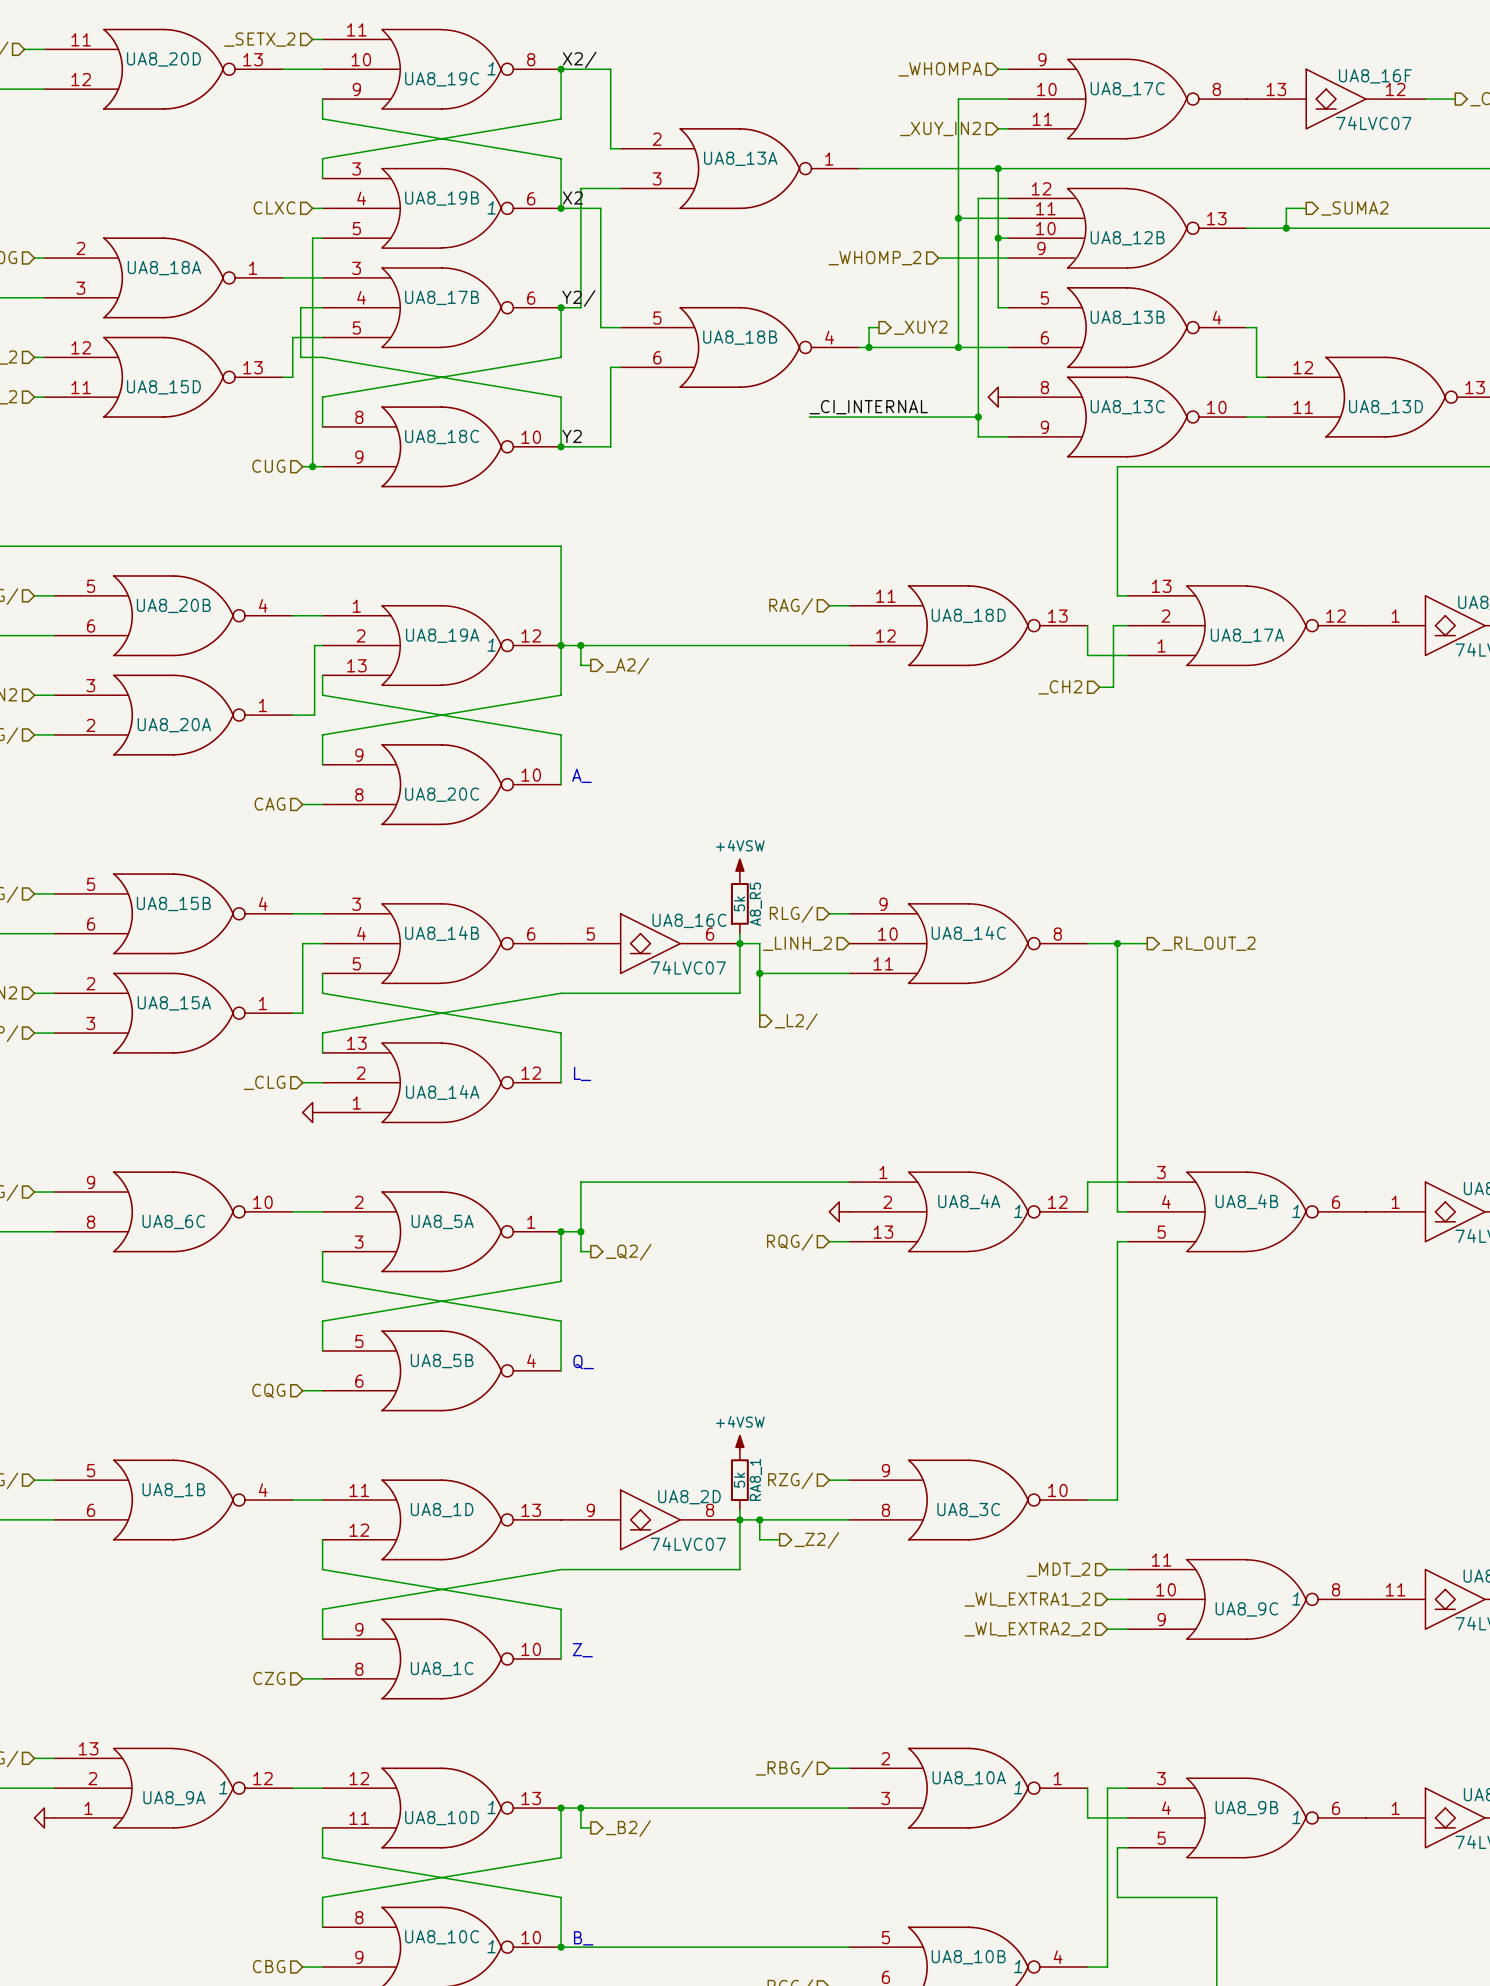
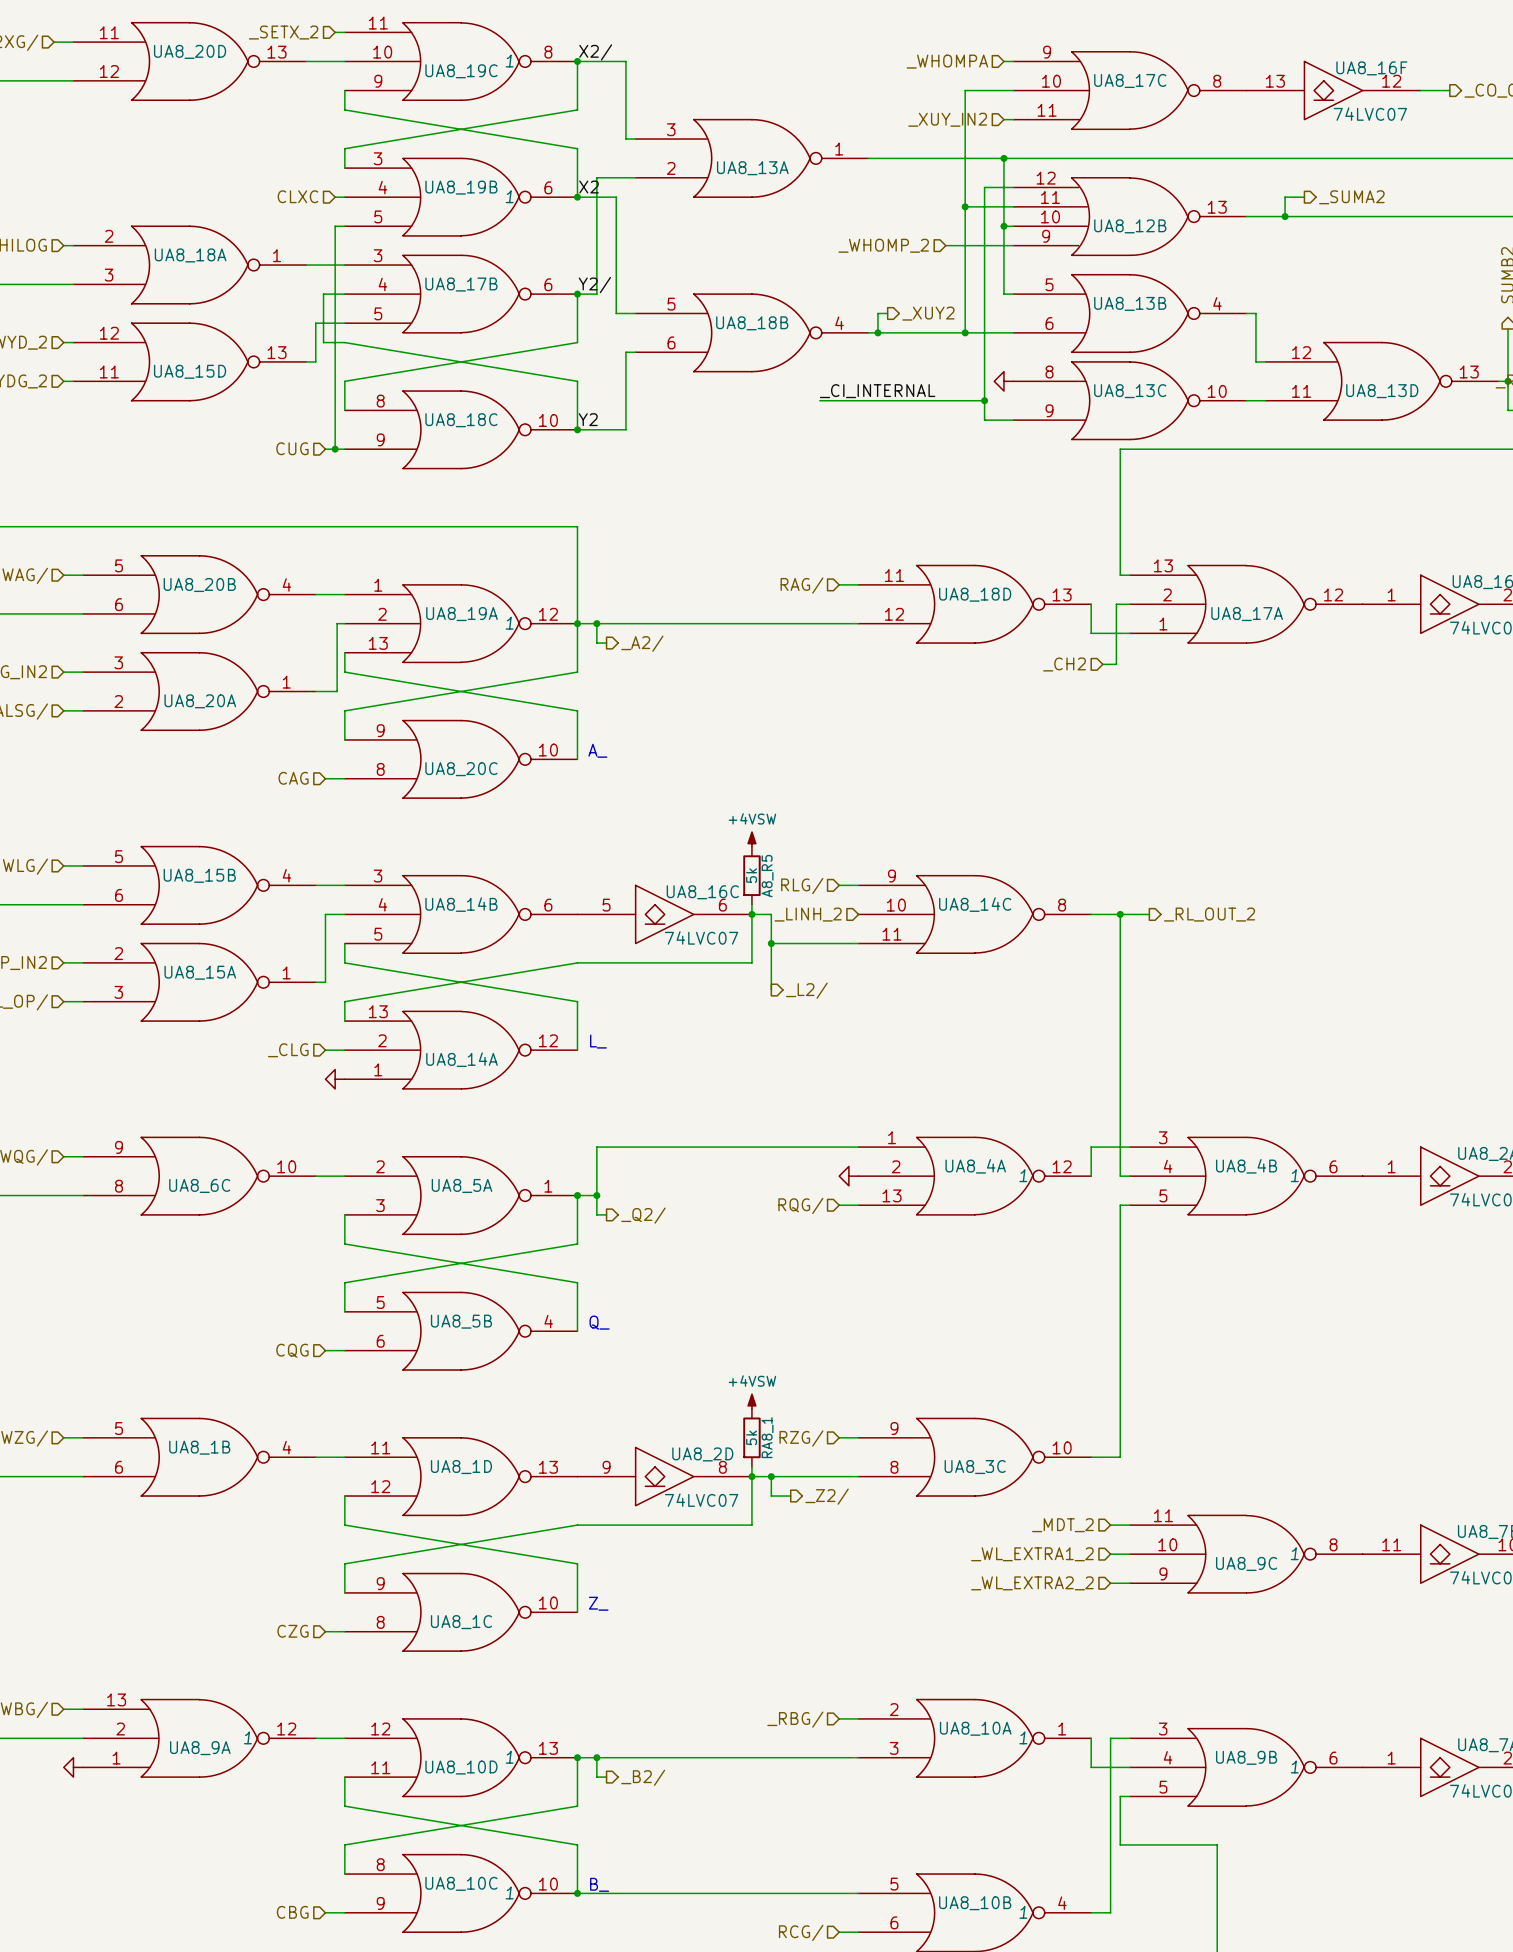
UA8_13A flip: as is (739, 168) -> up-down (751, 158)

